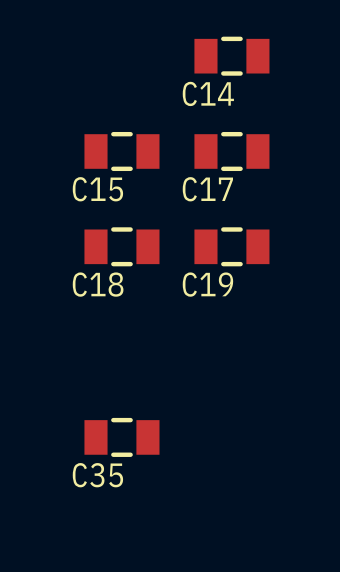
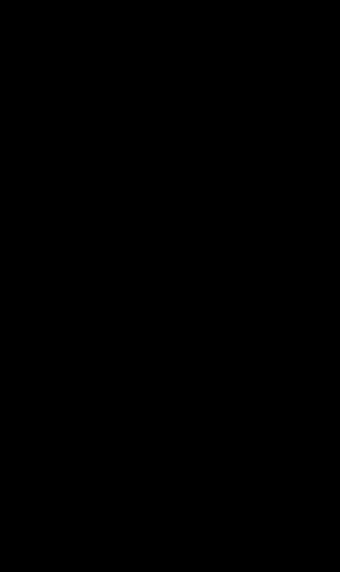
C14: (231, 56) -> none
C15: (121, 151) -> none
C17: (231, 151) -> none
C18: (121, 246) -> none
C19: (231, 246) -> none
C35: (121, 437) -> none

